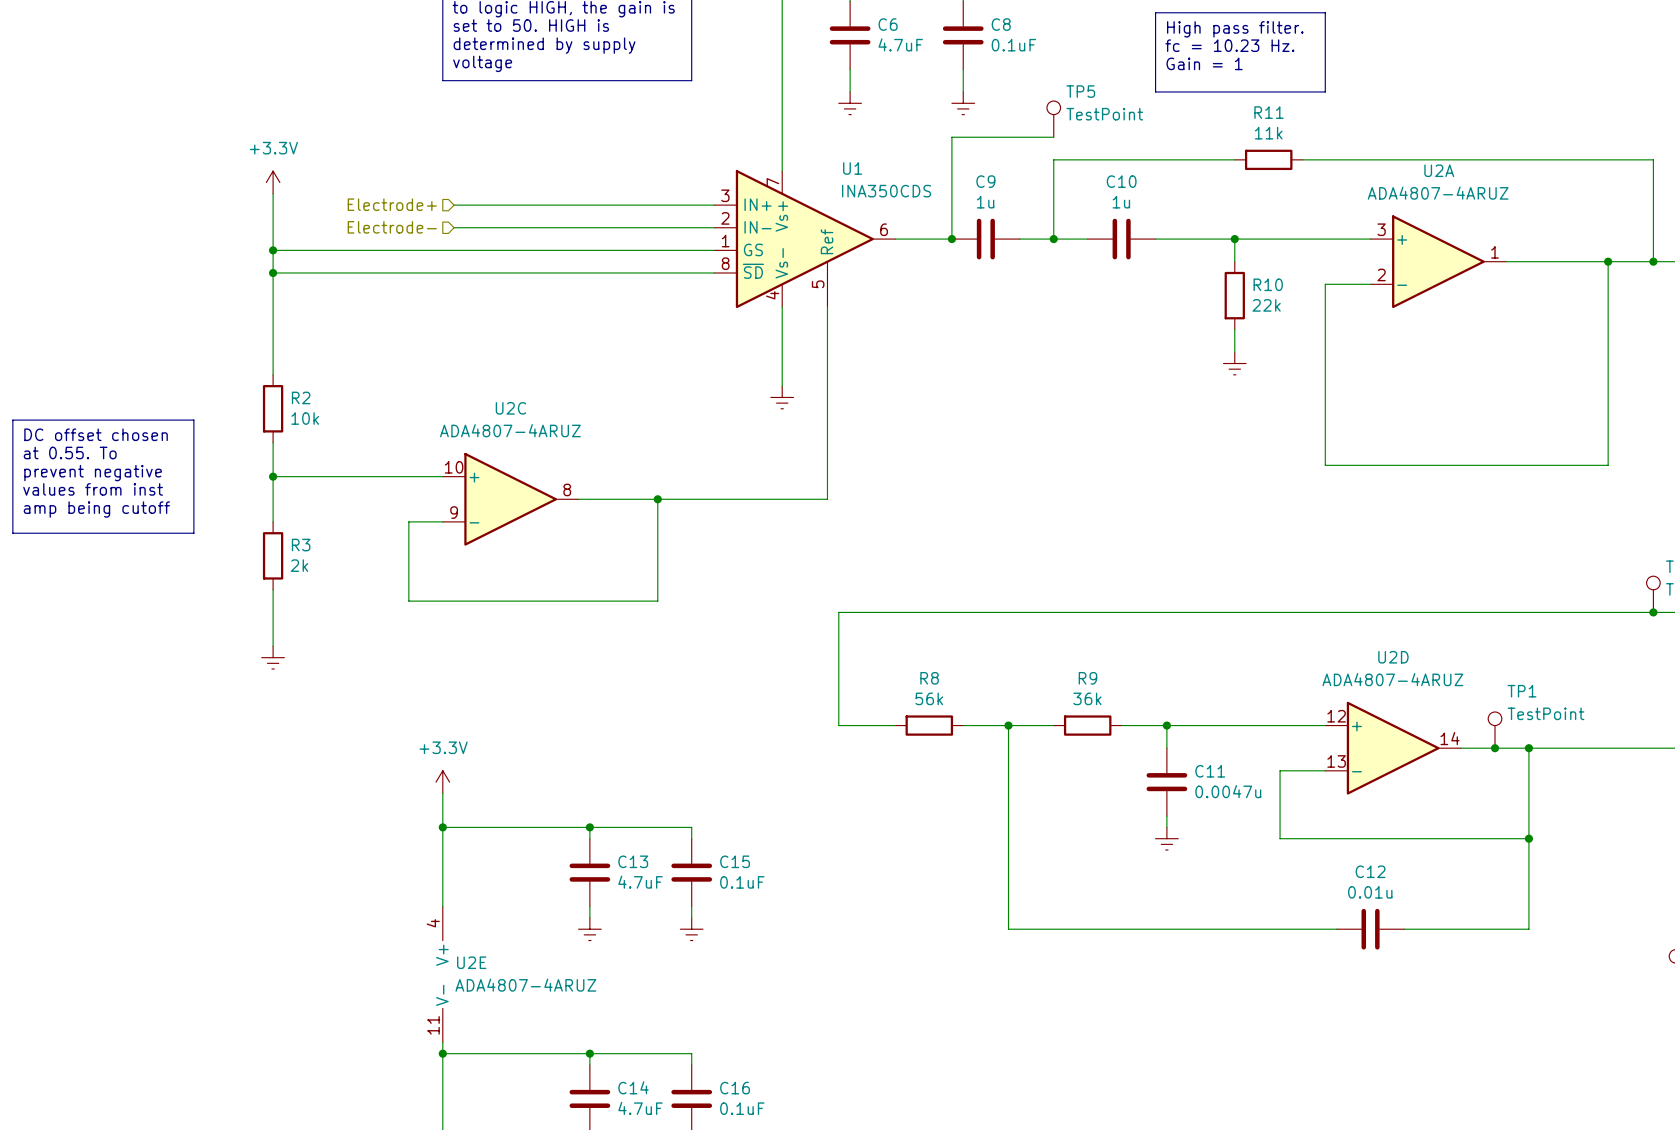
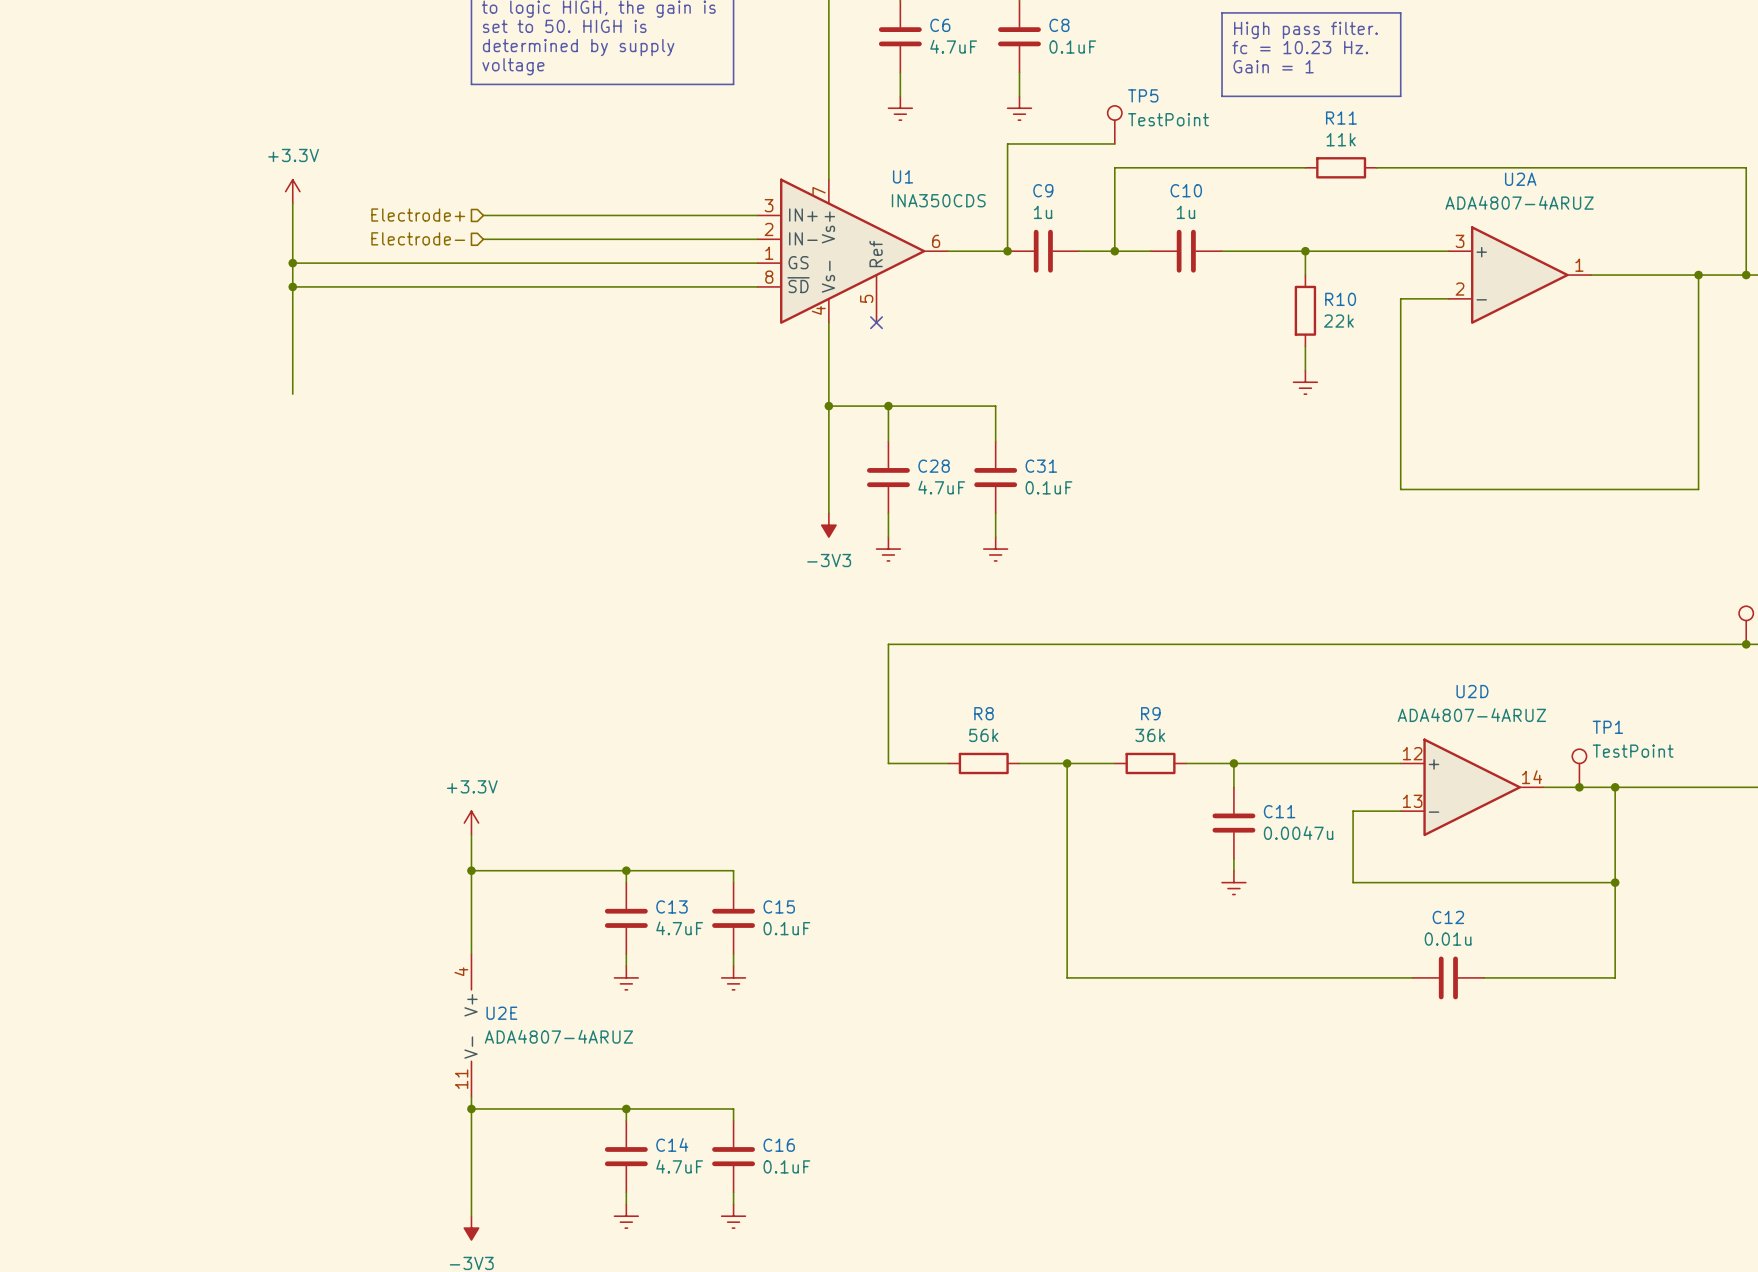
wire: (827, 306) (827, 499) (578, 499) -> none
no-connect mark: none -> (876, 322)
junction: none -> (828, 406)
wire: none -> (888, 406) (888, 441)
junction: none -> (888, 406)
power symbol: (782, 397) -> none
R2: 10k (273, 408) -> none
line: (12, 420) (193, 420) (193, 533) (12, 533) (12, 420) -> none
wire: none -> (995, 441) (995, 406) (828, 406) (828, 513)
text: DC offset chosen (96, 434) -> none
wire: (273, 442) (273, 521) -> none
text: at 0.55. To (70, 452) -> none
C28: none -> 4.7uF (888, 477)
C31: none -> 0.1uF (995, 477)
text: prevent negative (93, 473) -> none
wire: (273, 476) (442, 476) -> none
junction: (273, 476) -> none
wire: none -> (888, 513) (888, 537)
wire: none -> (995, 513) (995, 537)
text: values from inst (93, 489) -> none
U2C: ADA4807-4ARUZ (510, 499) -> none
wire: (657, 499) (657, 601) (408, 601) (408, 521) (442, 521) -> none
junction: (657, 499) -> none
power symbol: none -> -3V3 (828, 525)
text: amp being cutoff (96, 509) -> none
power symbol: none -> (888, 549)
power symbol: none -> (995, 549)
R3: 2k (273, 555) -> none
wire: (273, 589) (273, 646) -> none
power symbol: (273, 657) -> none

